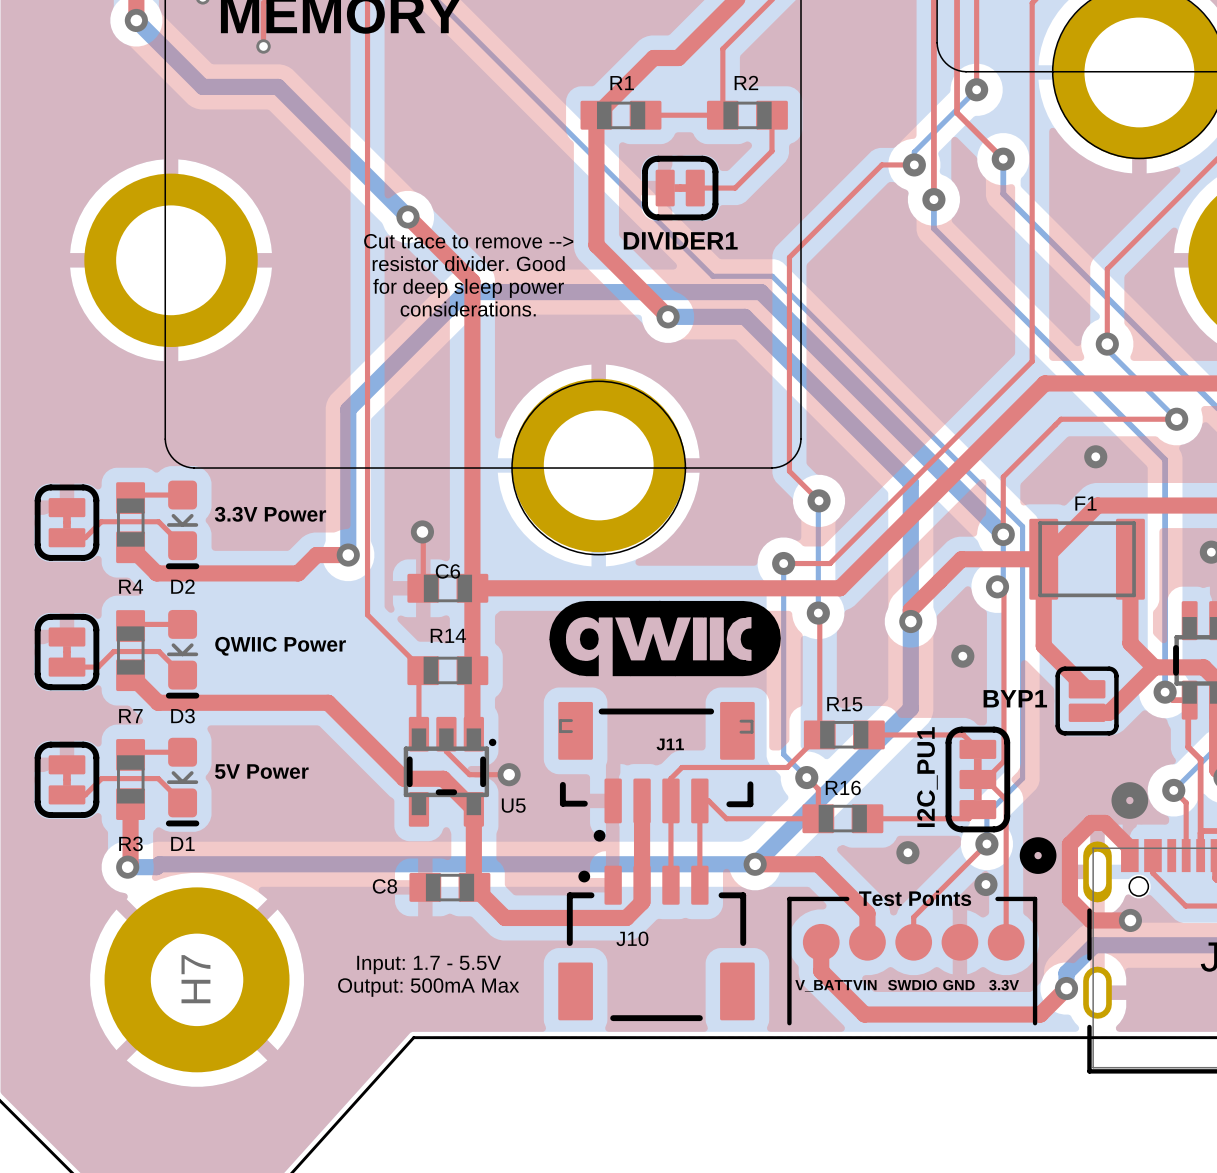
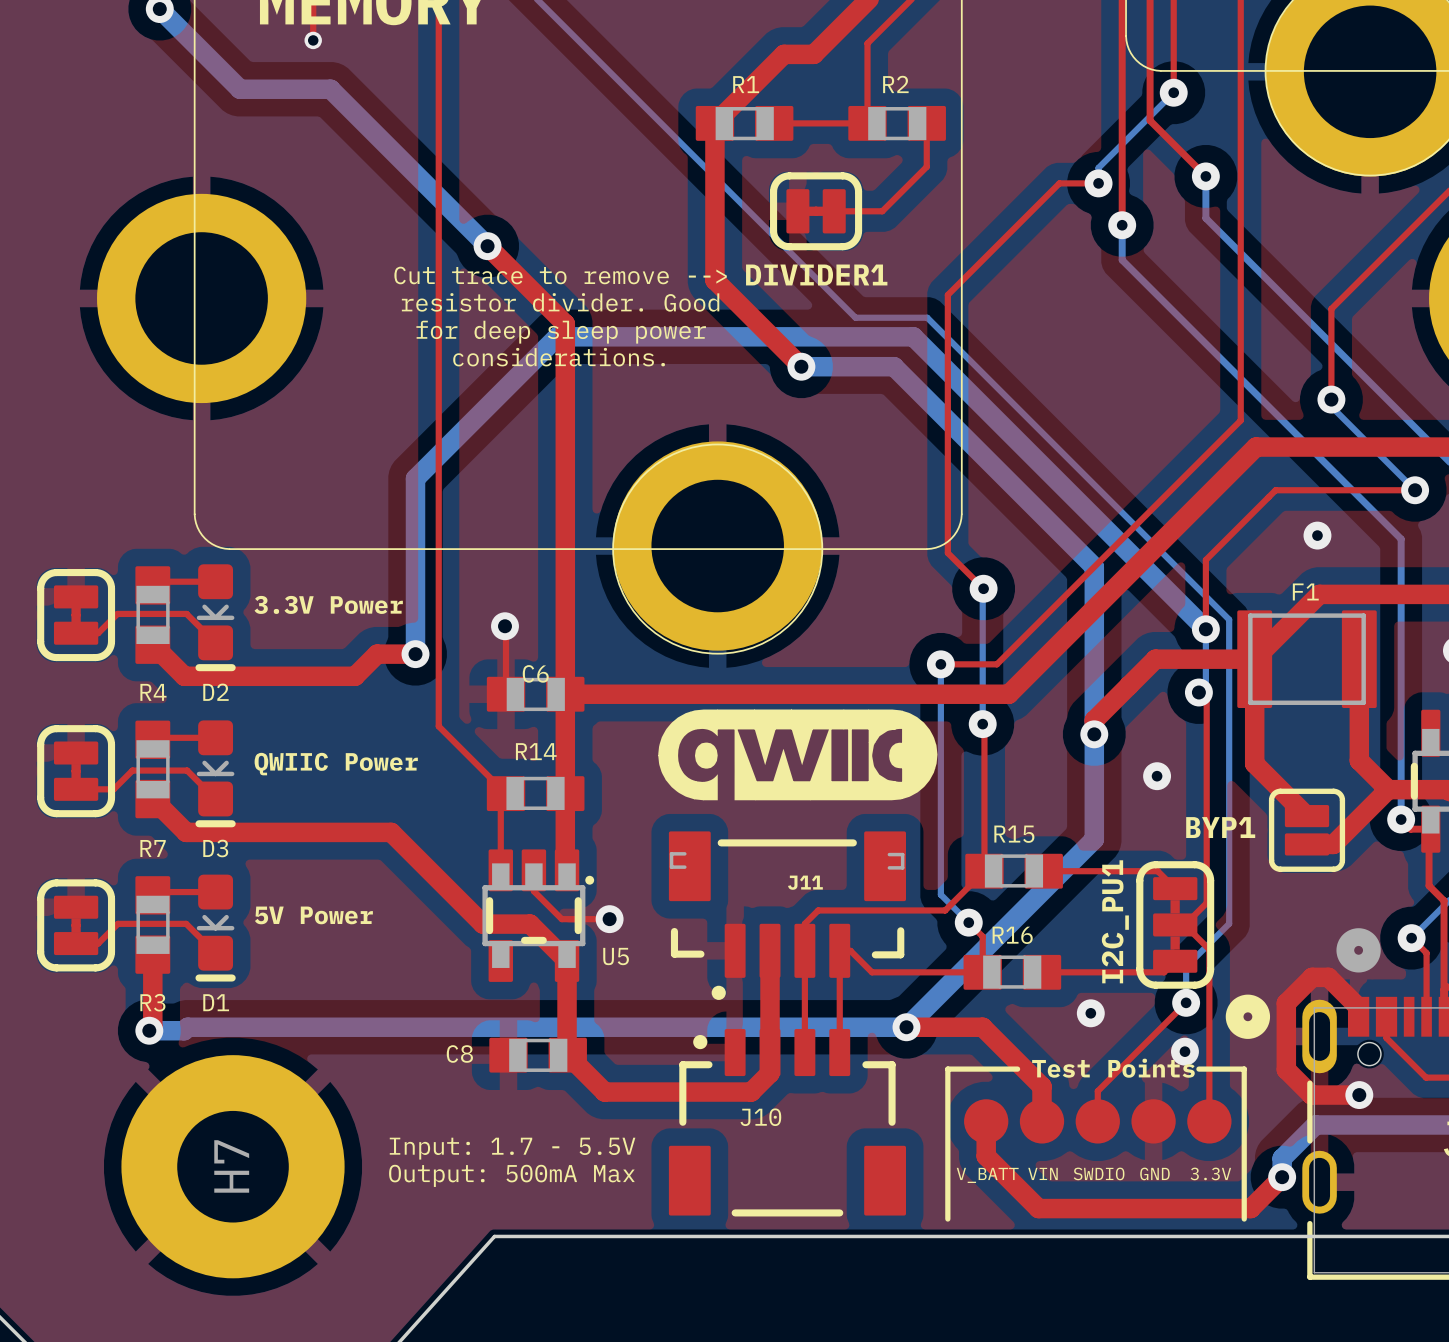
text: VIN (864, 985) -> none
VIN name: none -> VIN (1043, 1173)
text: SWDIO (912, 985) -> none
SWDIO name: none -> SWDIO (1099, 1173)
text: GND (958, 985) -> none
GND name: none -> GND (1154, 1173)
text: 3.3V (1004, 985) -> none
3.3V name: none -> 3.3V (1210, 1173)
text: V_BATT (823, 986) -> none
V_BATT name: none -> V_BATT (987, 1175)

